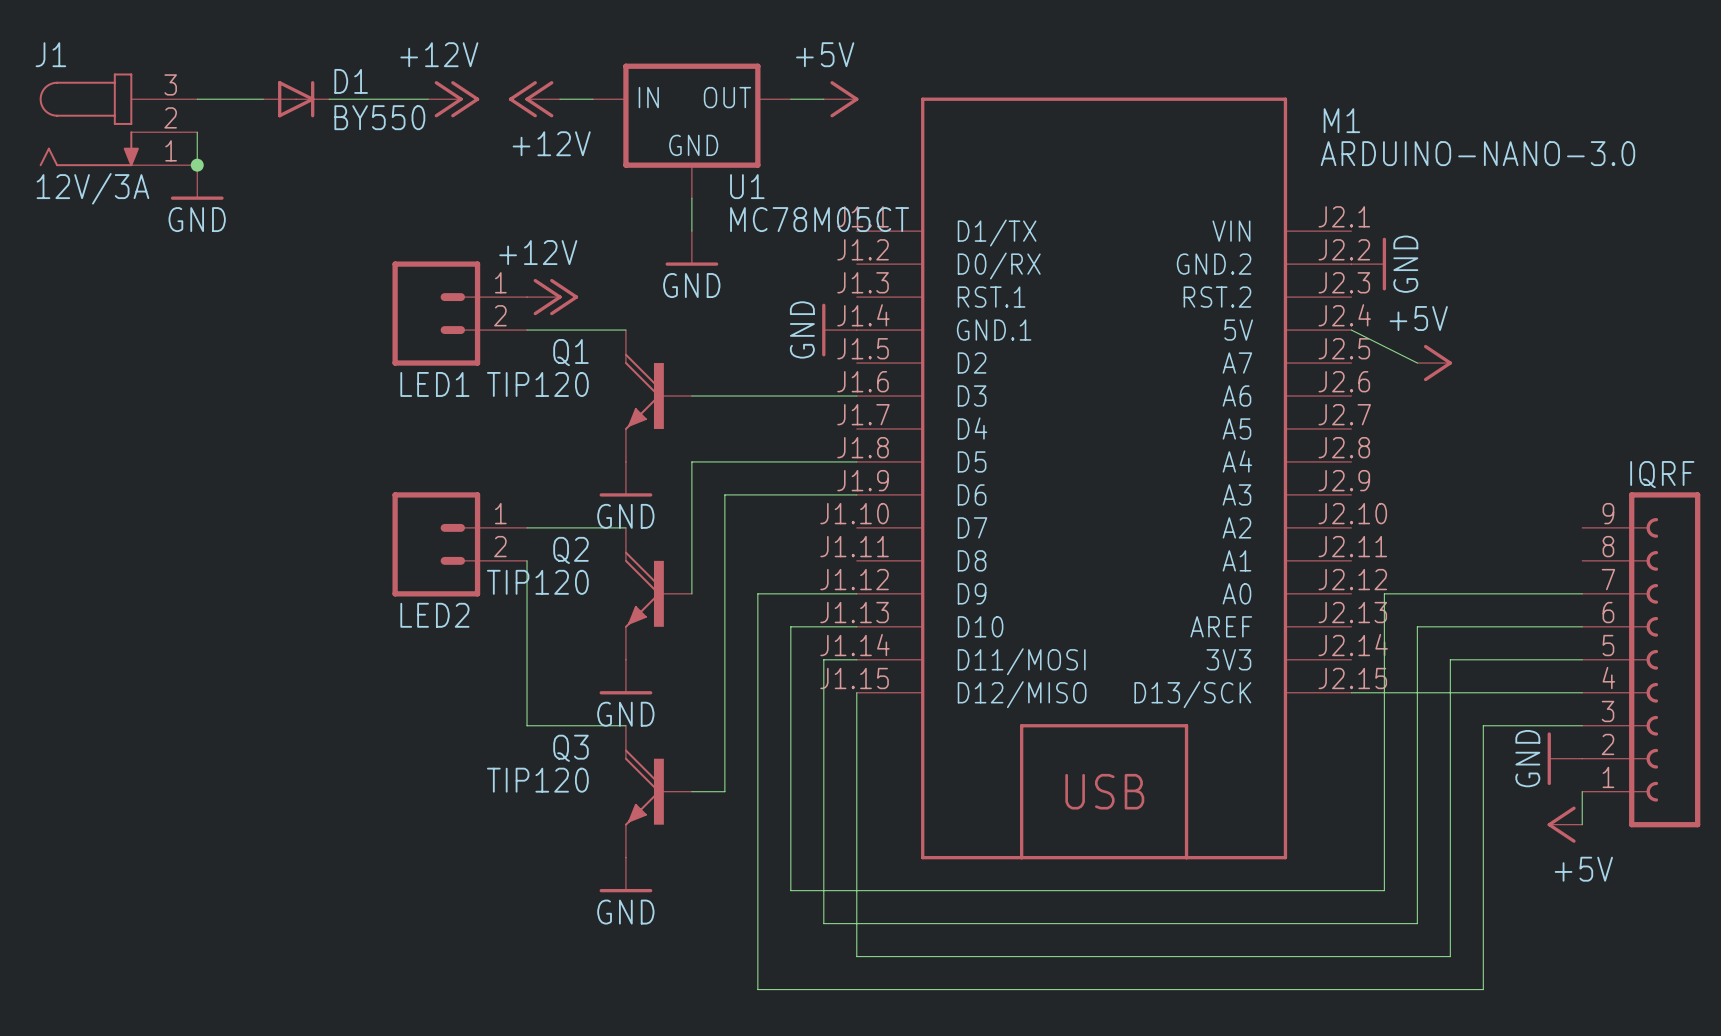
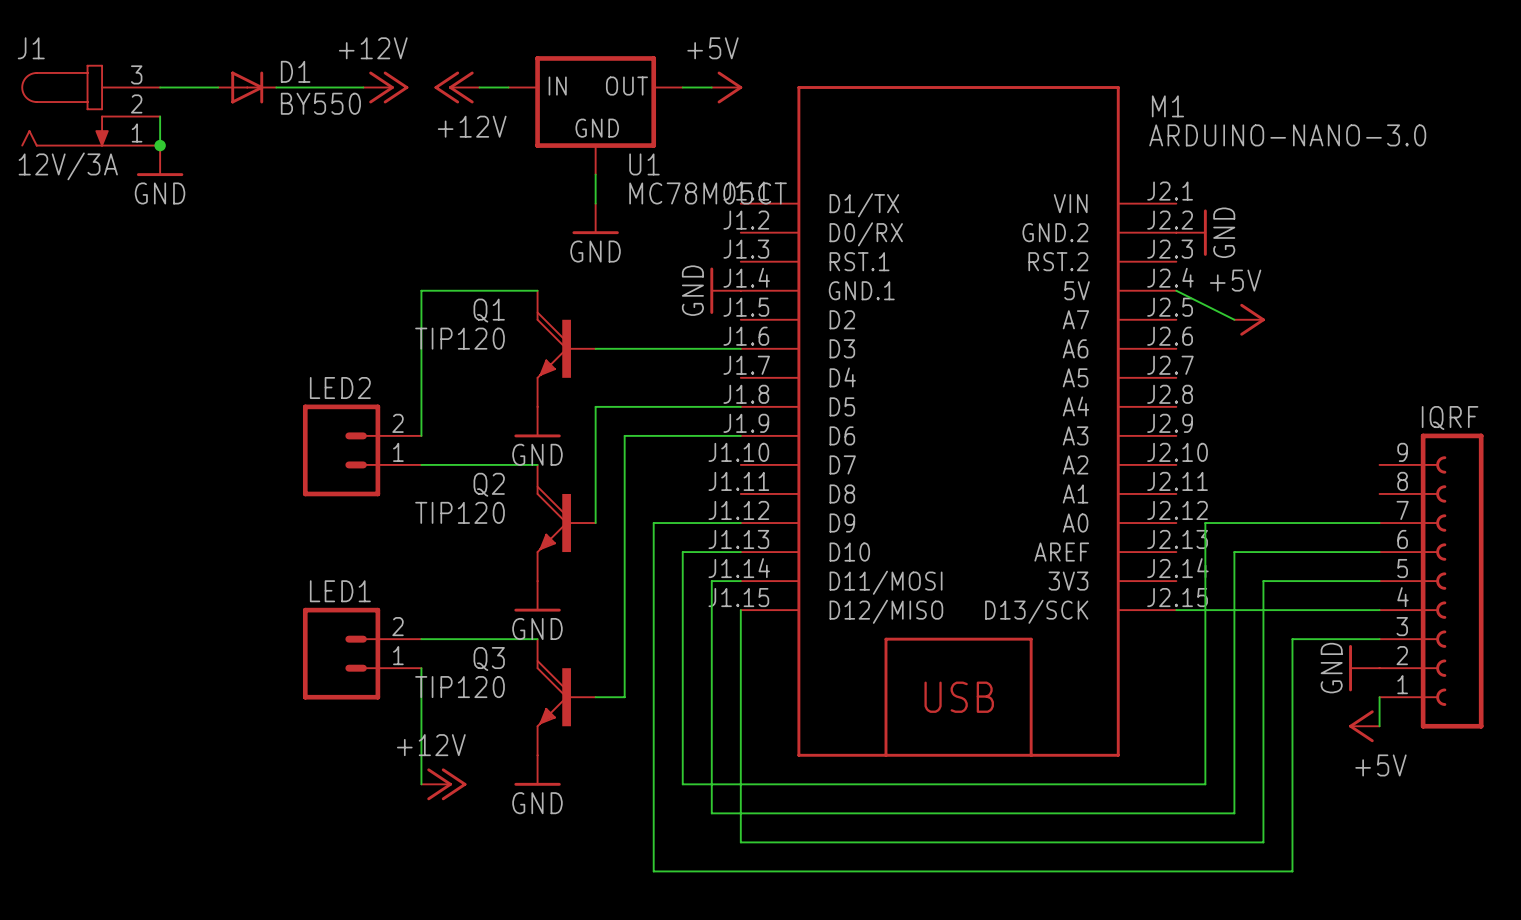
power symbol: +12V (552, 297) -> none
LED1 flip: as is (436, 313) -> up-down (341, 653)
LED1 position: (459, 313) -> (362, 653)
wire: none -> (450, 290) (421, 290) (421, 435)
LED2 flip: as is (436, 544) -> up-down (341, 450)
wire: (527, 560) (527, 725) -> (421, 639) (450, 639)
wire: none -> (421, 668) (421, 784)
power symbol: none -> +12V (443, 784)

